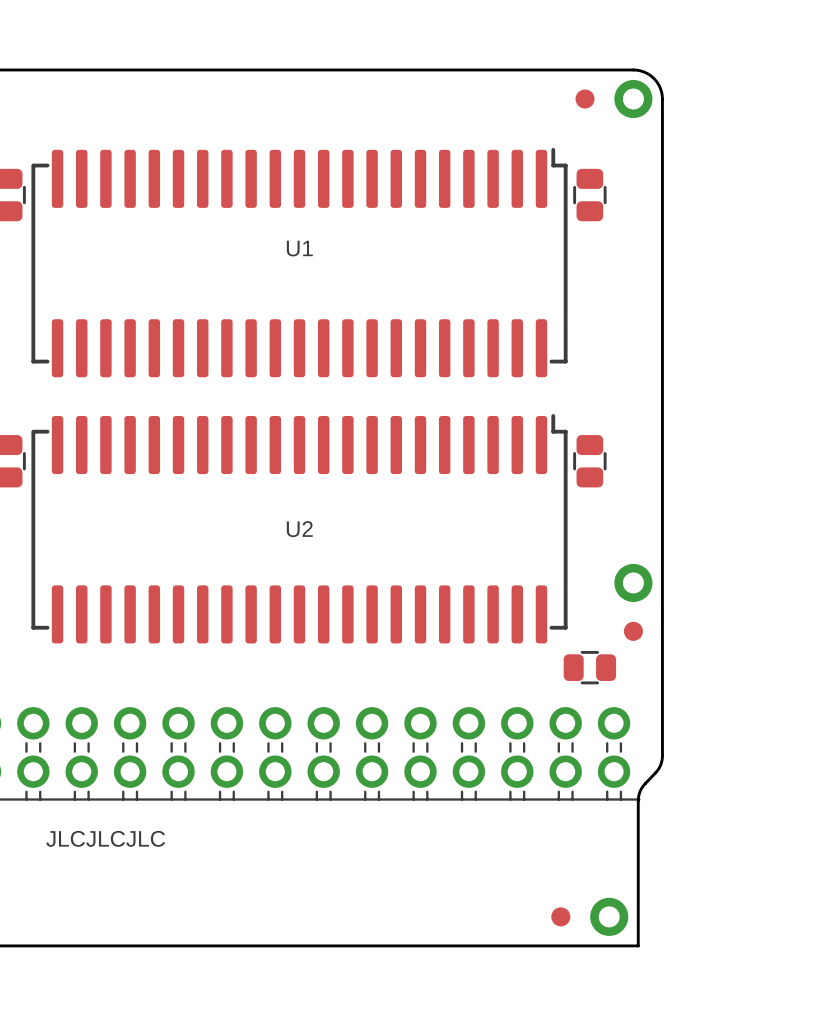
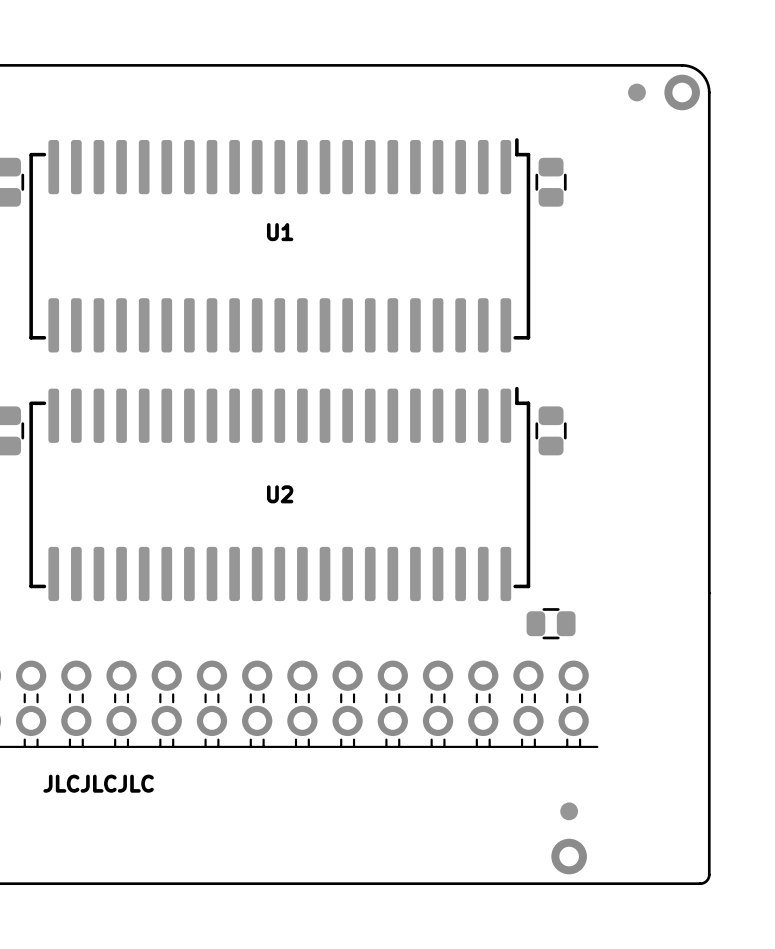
board edge: (633, 69) (644, 72) (653, 78) (660, 87) (662, 99) (662, 755) (659, 768) (643, 785) (638, 797) (638, 945) -> (591, 65) (689, 66) (703, 75) (709, 92) (709, 875) (706, 881) (701, 883) (596, 883)
part position: (585, 99) -> (636, 92)
part position: (633, 99) -> (682, 92)
part: (633, 582) -> none
part: (633, 631) -> none
part position: (560, 916) -> (569, 811)

